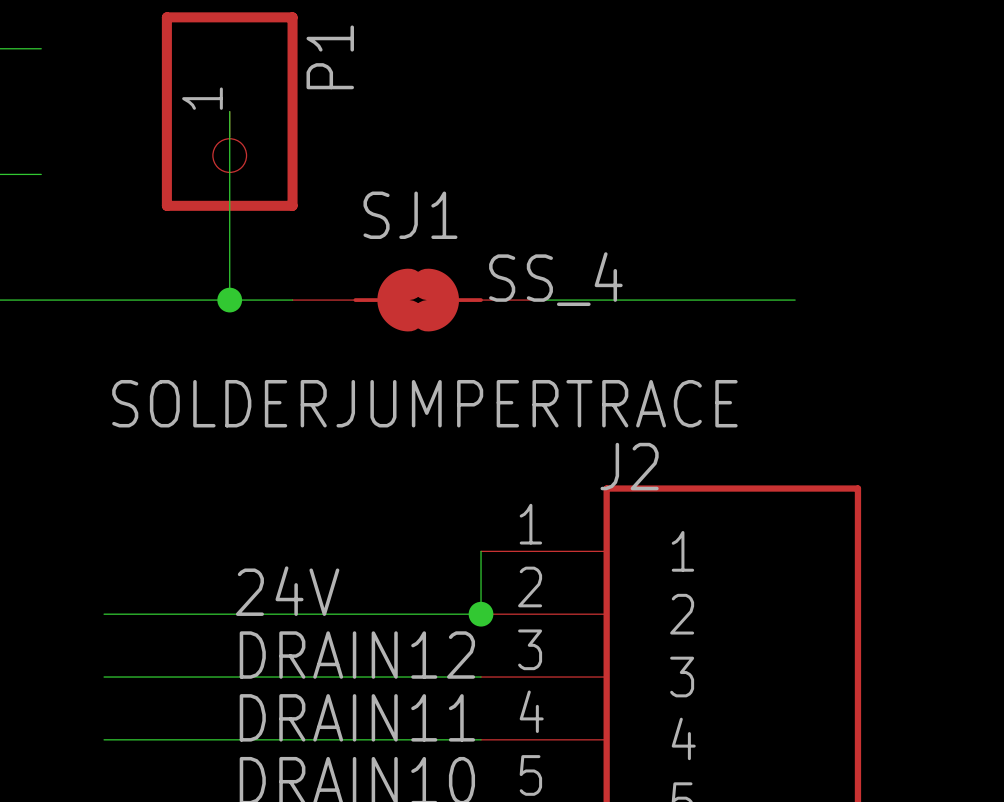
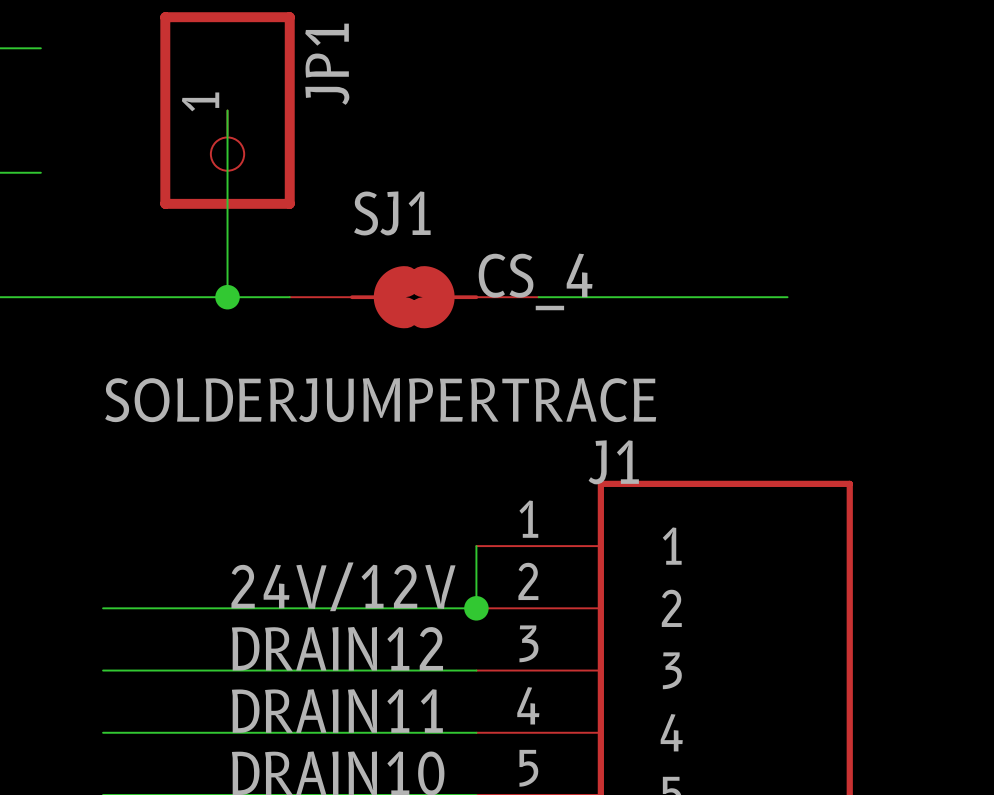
P1 name: P1 (330, 57) -> JP1 (327, 64)
label: SS_4 (555, 279) -> CS_4 (535, 281)
J2 name: J2 (629, 466) -> J1 (613, 462)
label: 24V (287, 591) -> 24V/12V (343, 586)

